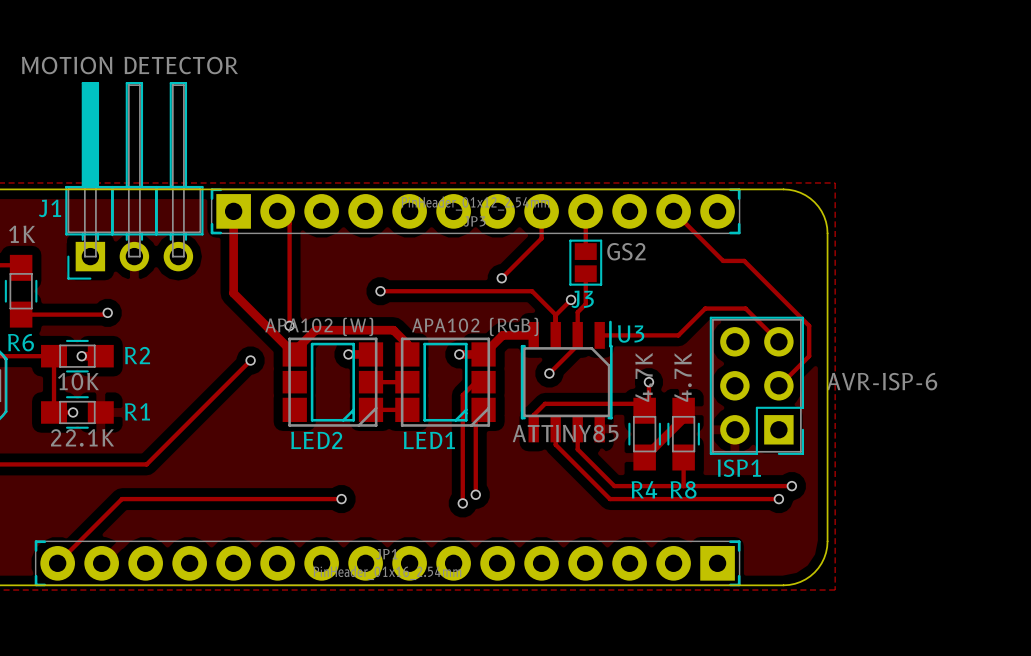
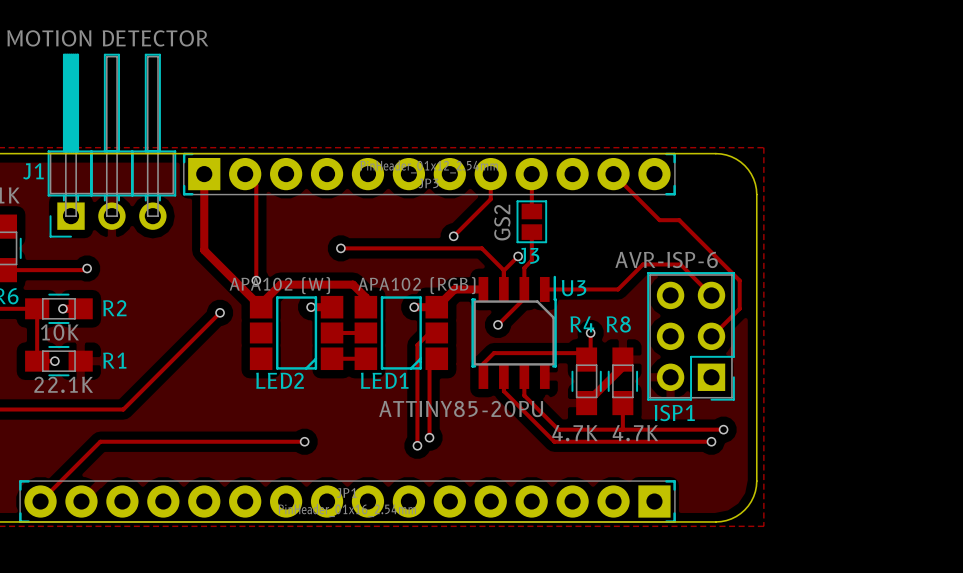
J3 value rotation: 0° (626, 251) -> 90° counterclockwise (502, 222)
J3 value position: GS2 (626, 251) -> GS2 (502, 222)
LED2 footprint: [282, 337, 384, 427] -> [249, 295, 344, 371]
LED1 footprint: [395, 337, 496, 427] -> [354, 295, 449, 371]
R4 value rotation: 0° (644, 377) -> 90° clockwise (575, 433)
R4 value position: 4.7K (644, 377) -> 4.7K (575, 433)
R8 value rotation: 0° (683, 377) -> 90° clockwise (635, 433)
R8 value position: 4.7K (683, 377) -> 4.7K (635, 433)
ISP1 value position: AVR-ISP-6 (882, 381) -> AVR-ISP-6 (666, 259)
U3 value: ATTINY85 (565, 433) -> ATTINY85-20PU (461, 408)
R4 name position: R4 (644, 489) -> R4 (582, 324)
R8 name position: R8 (683, 489) -> R8 (618, 324)

